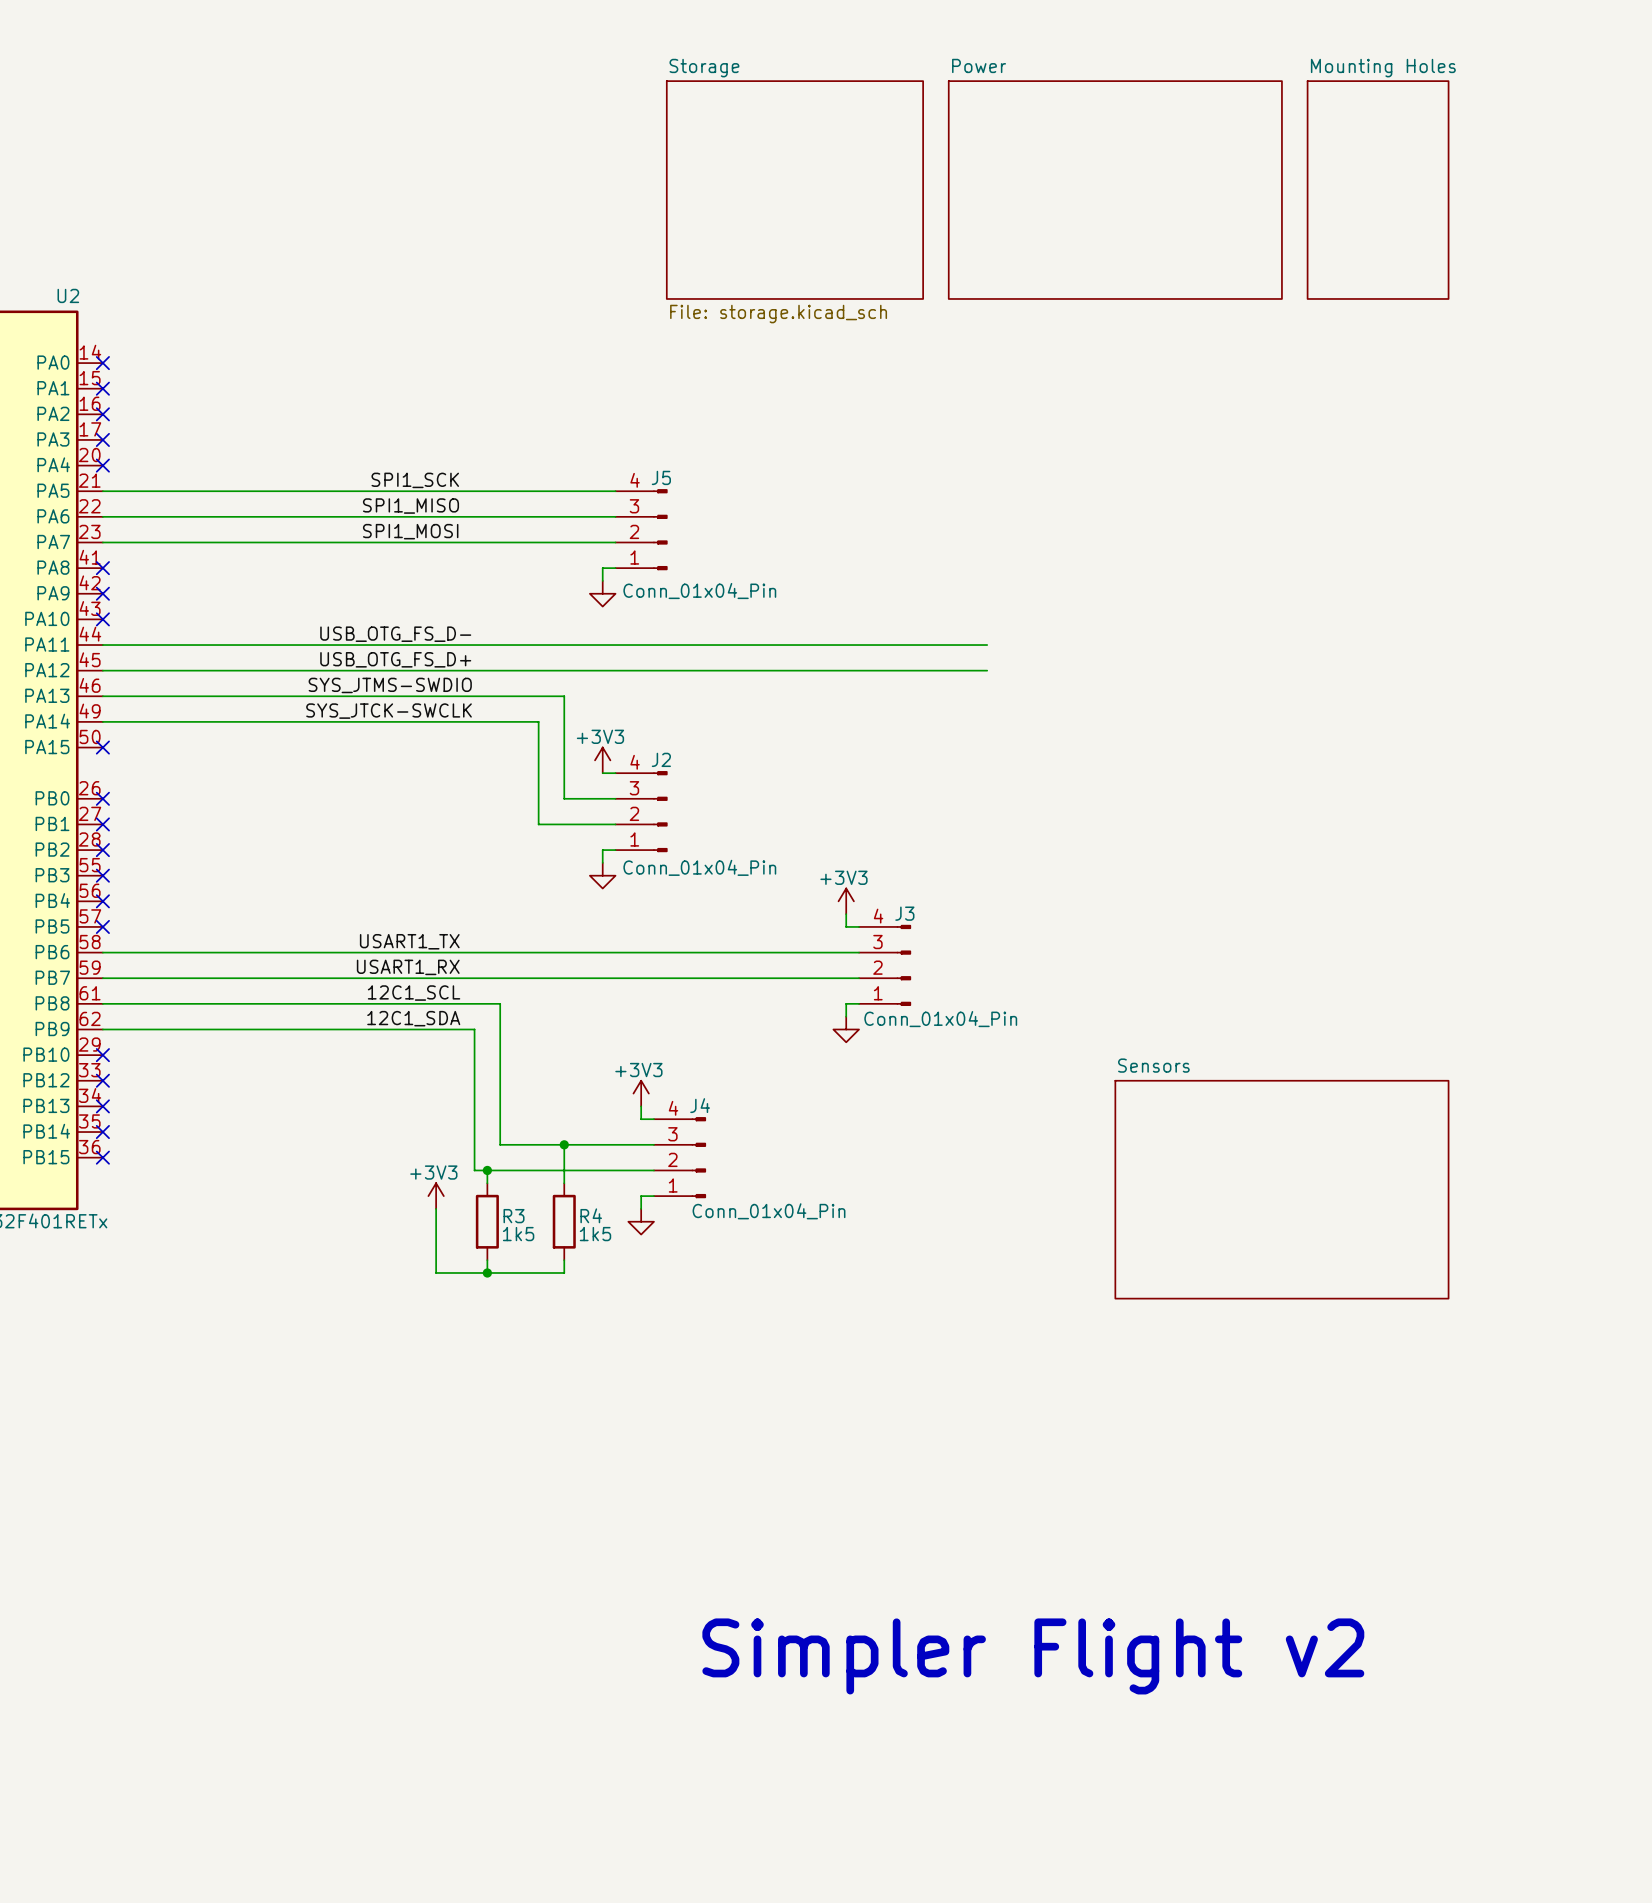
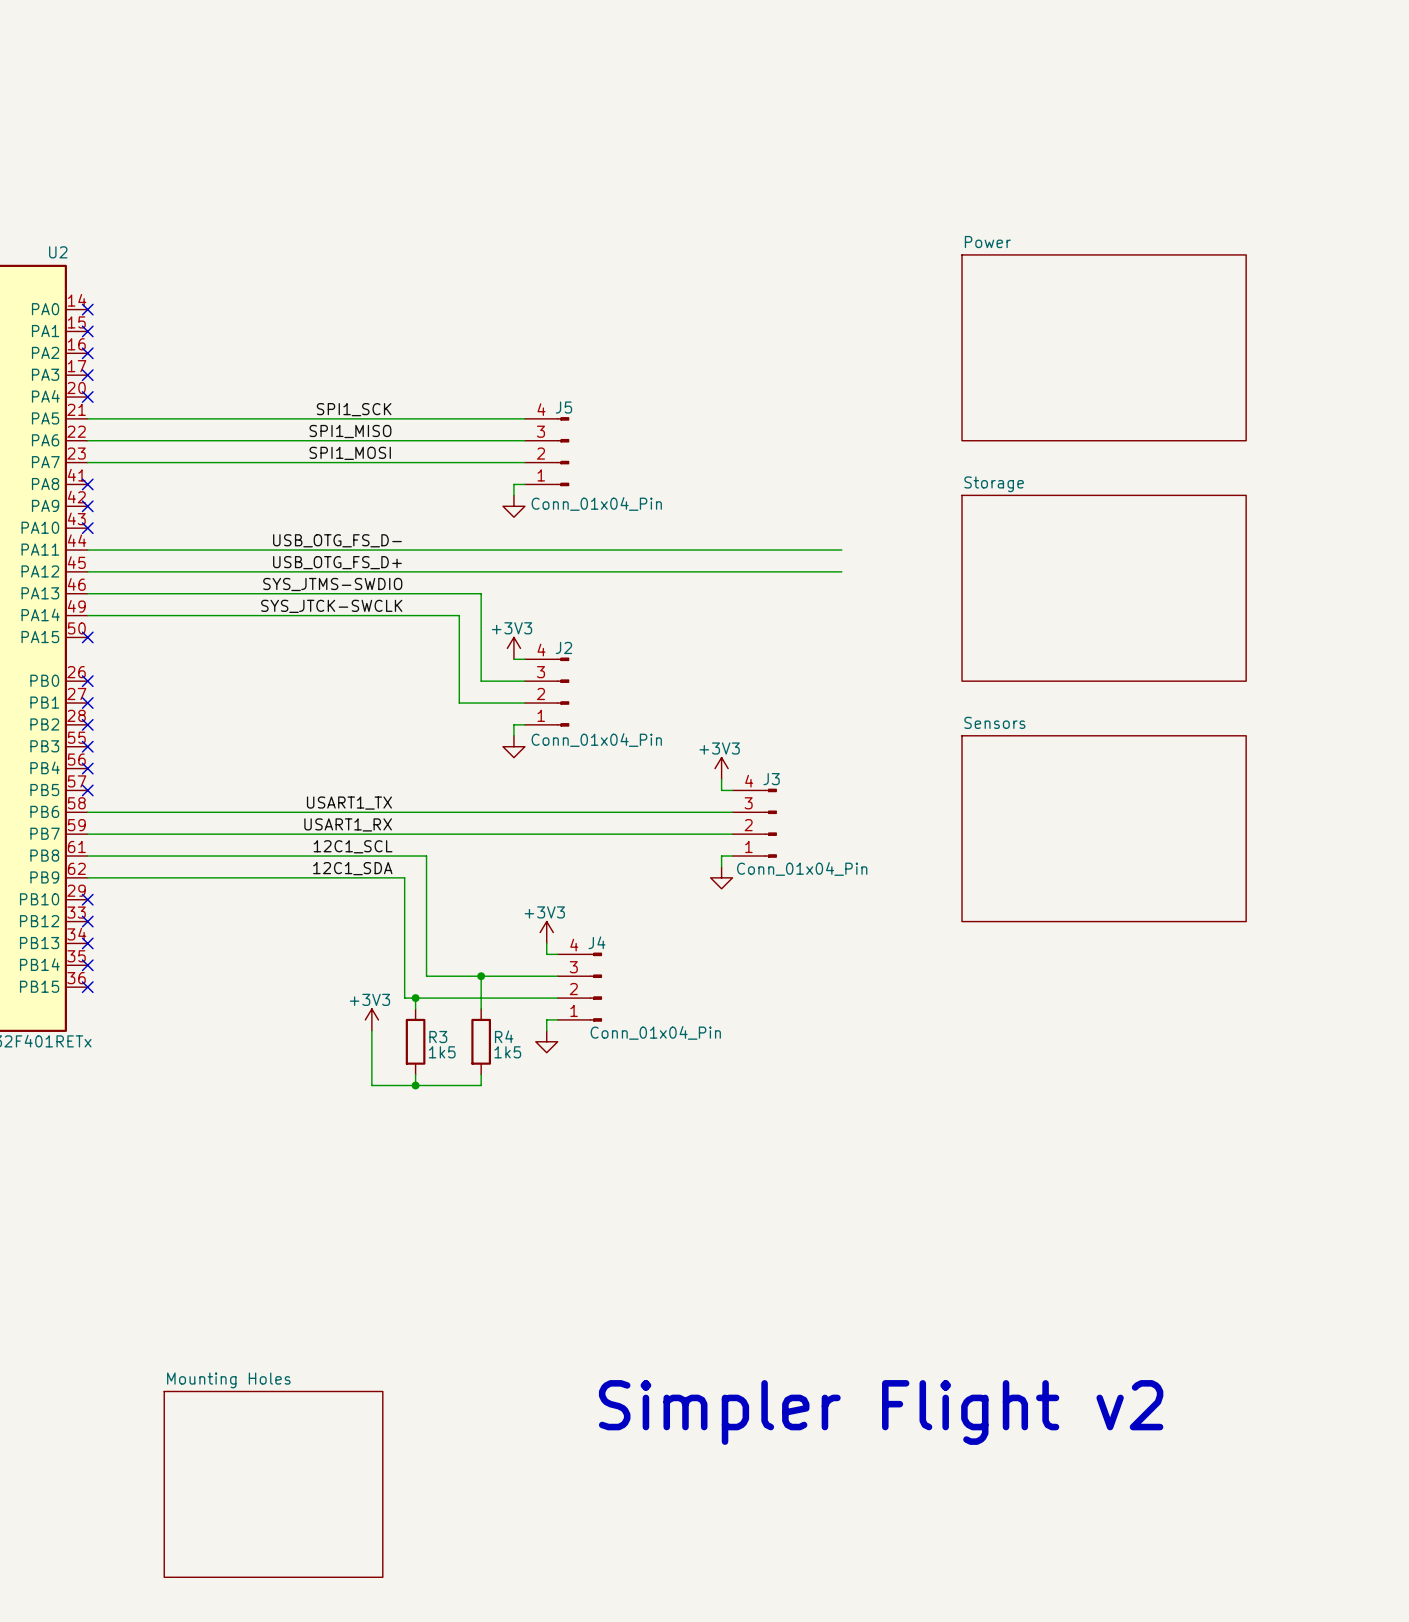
sheet Storage: File: storage.kicad_sch (794, 190) -> none
sheet Power: (1115, 190) -> none
sheet Mounting Holes: (1378, 190) -> none
sheet Power: none -> (1104, 347)
sheet Storage: none -> (1104, 588)
sheet Sensors position: (1281, 1189) -> (1104, 828)
sheet Mounting Holes: none -> (273, 1484)

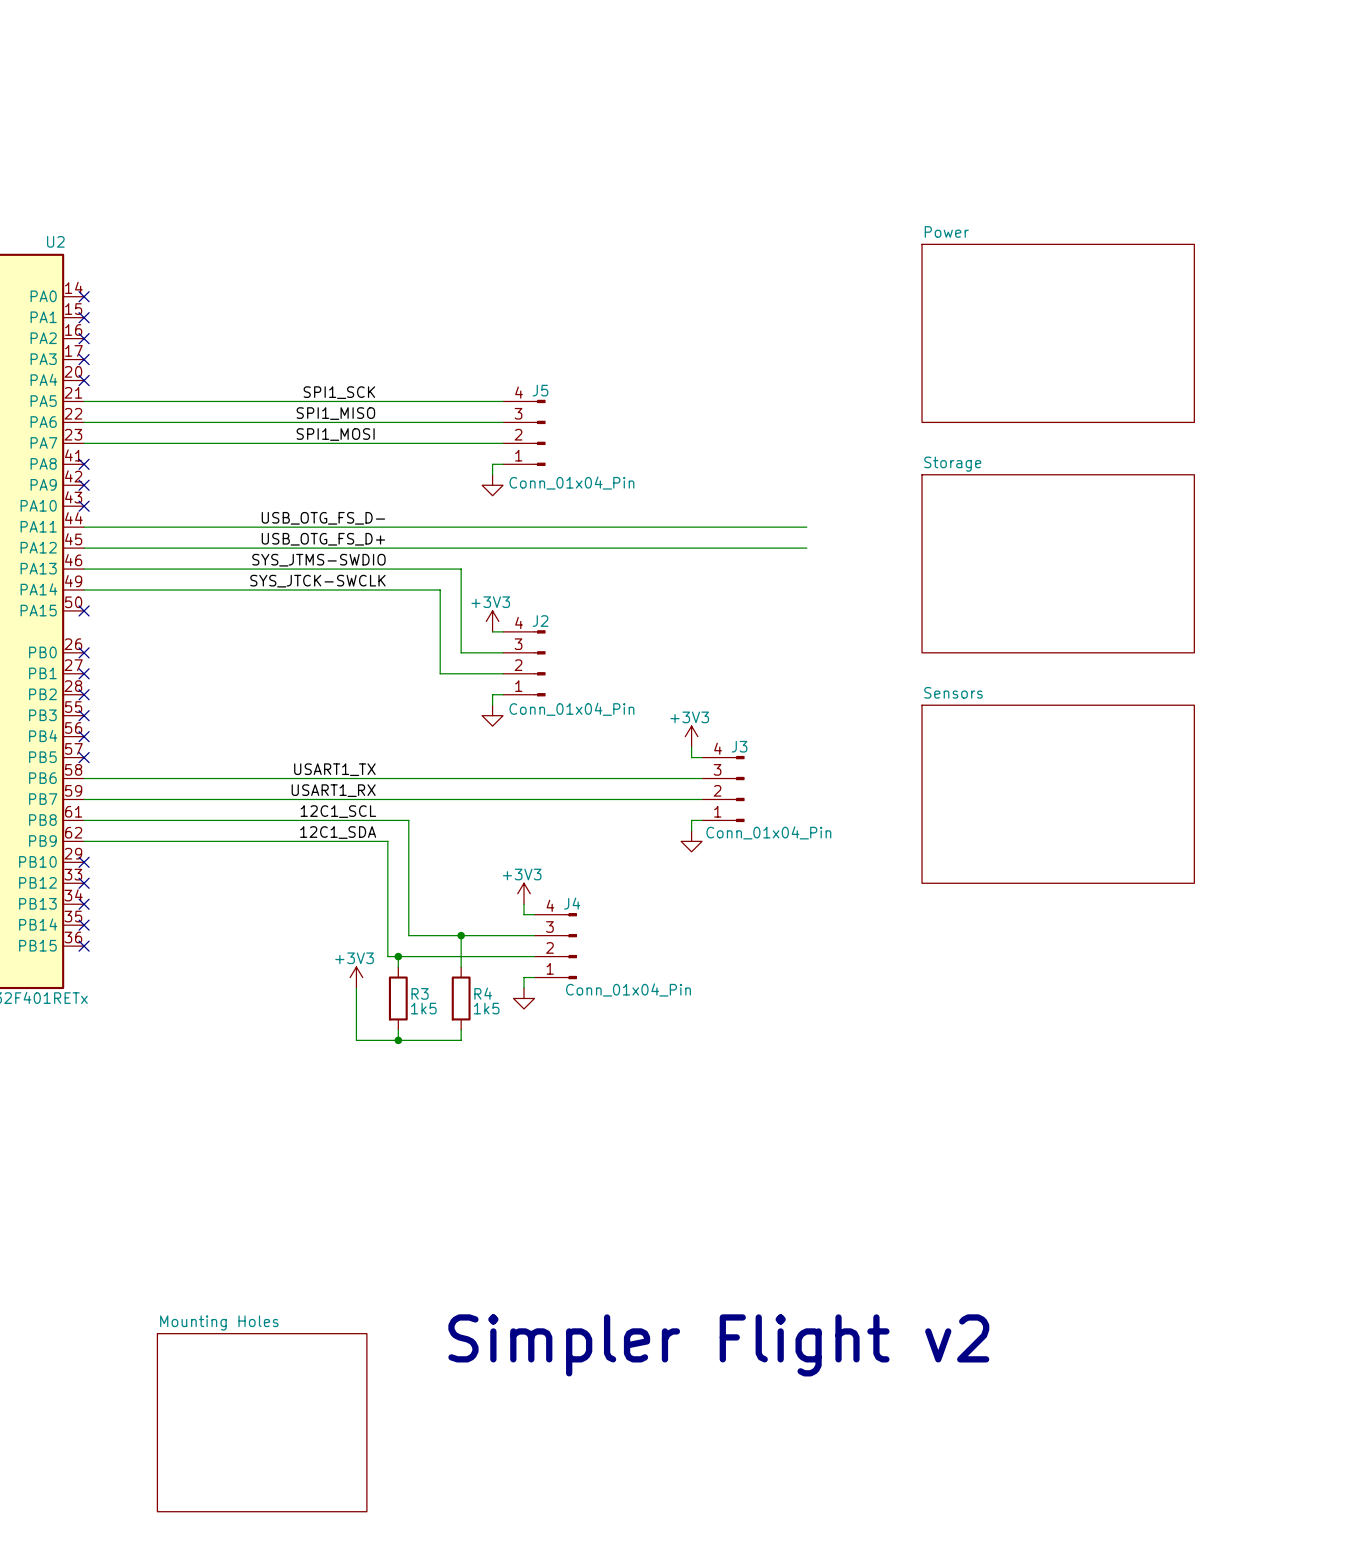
text position: Simpler Flight v2 (881, 1412) -> Simpler Flight v2 (718, 1345)

